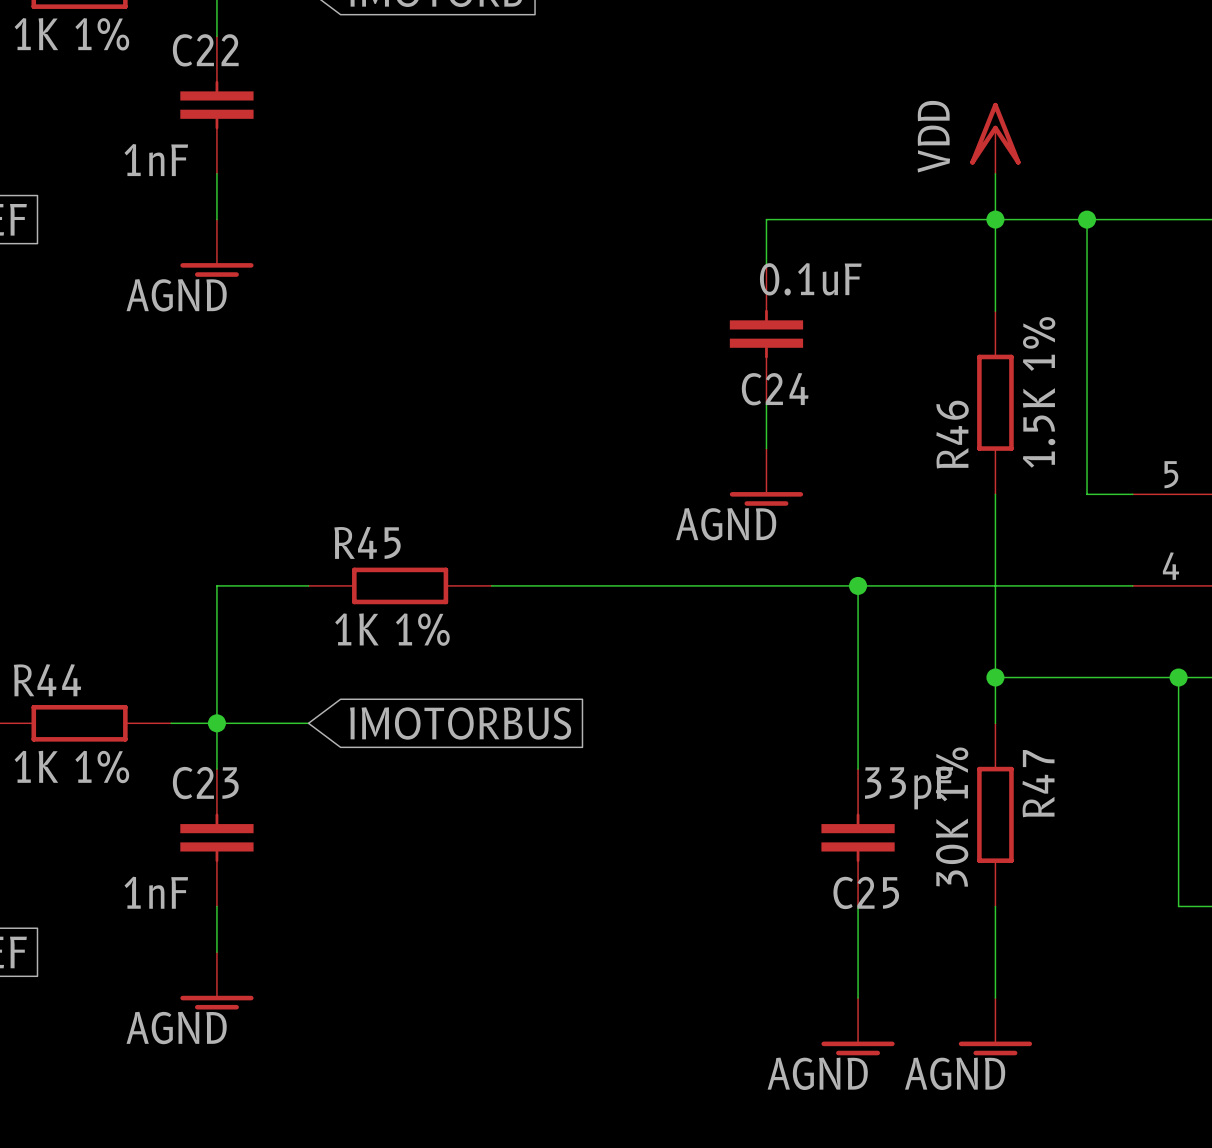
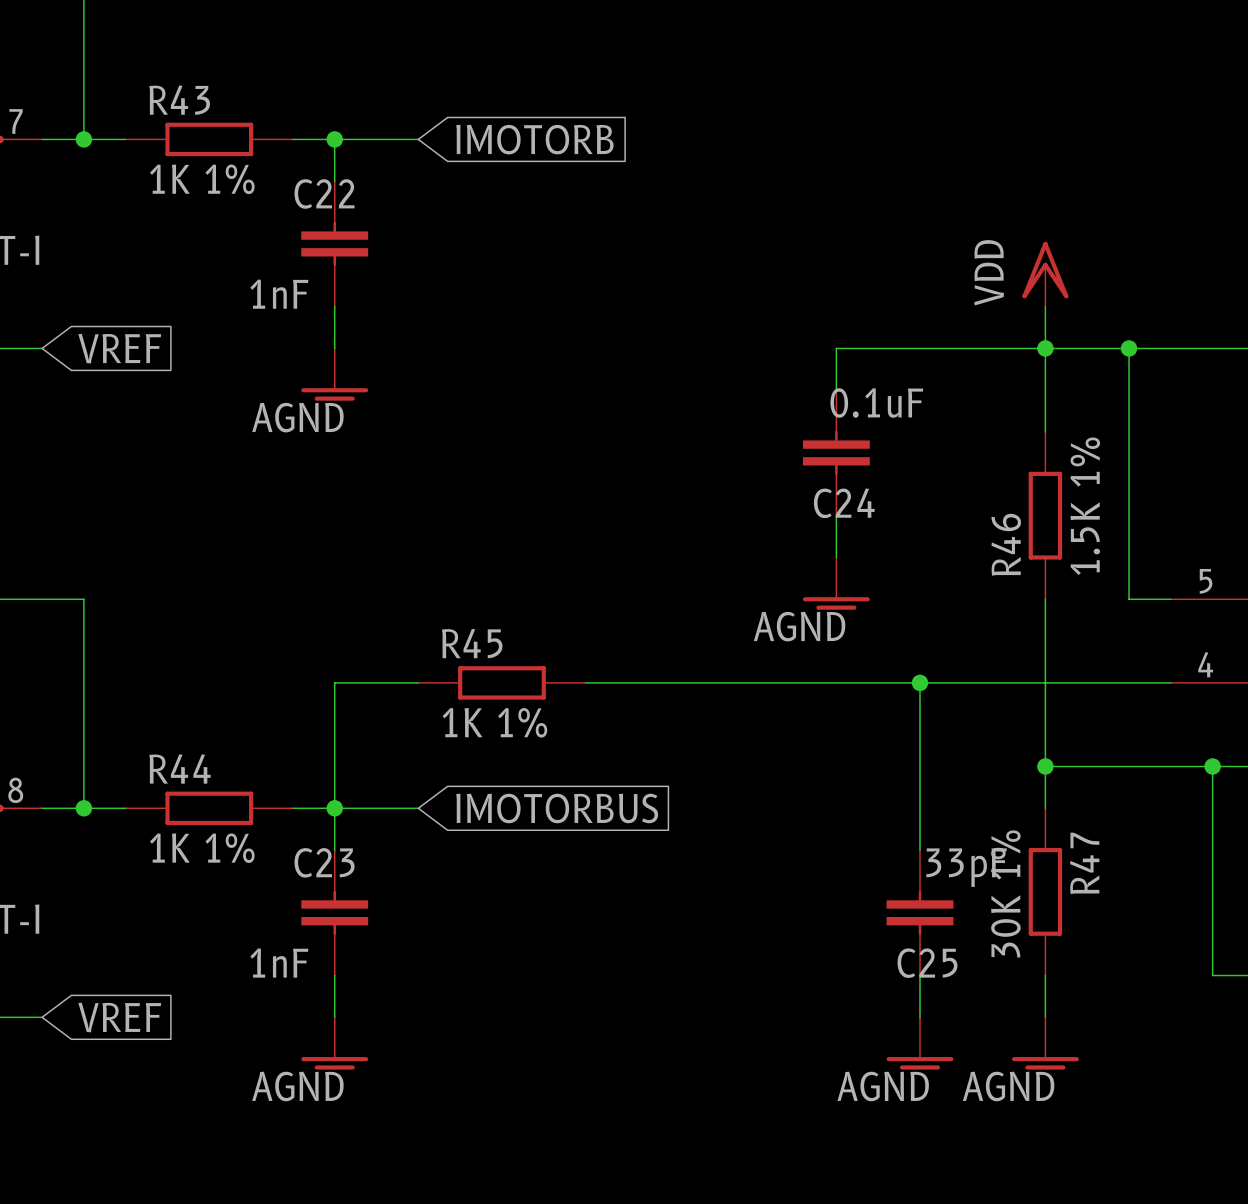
power symbol position: AGND (858, 1026) -> AGND (919, 1043)
power symbol position: AGND (995, 1026) -> AGND (1045, 1043)

